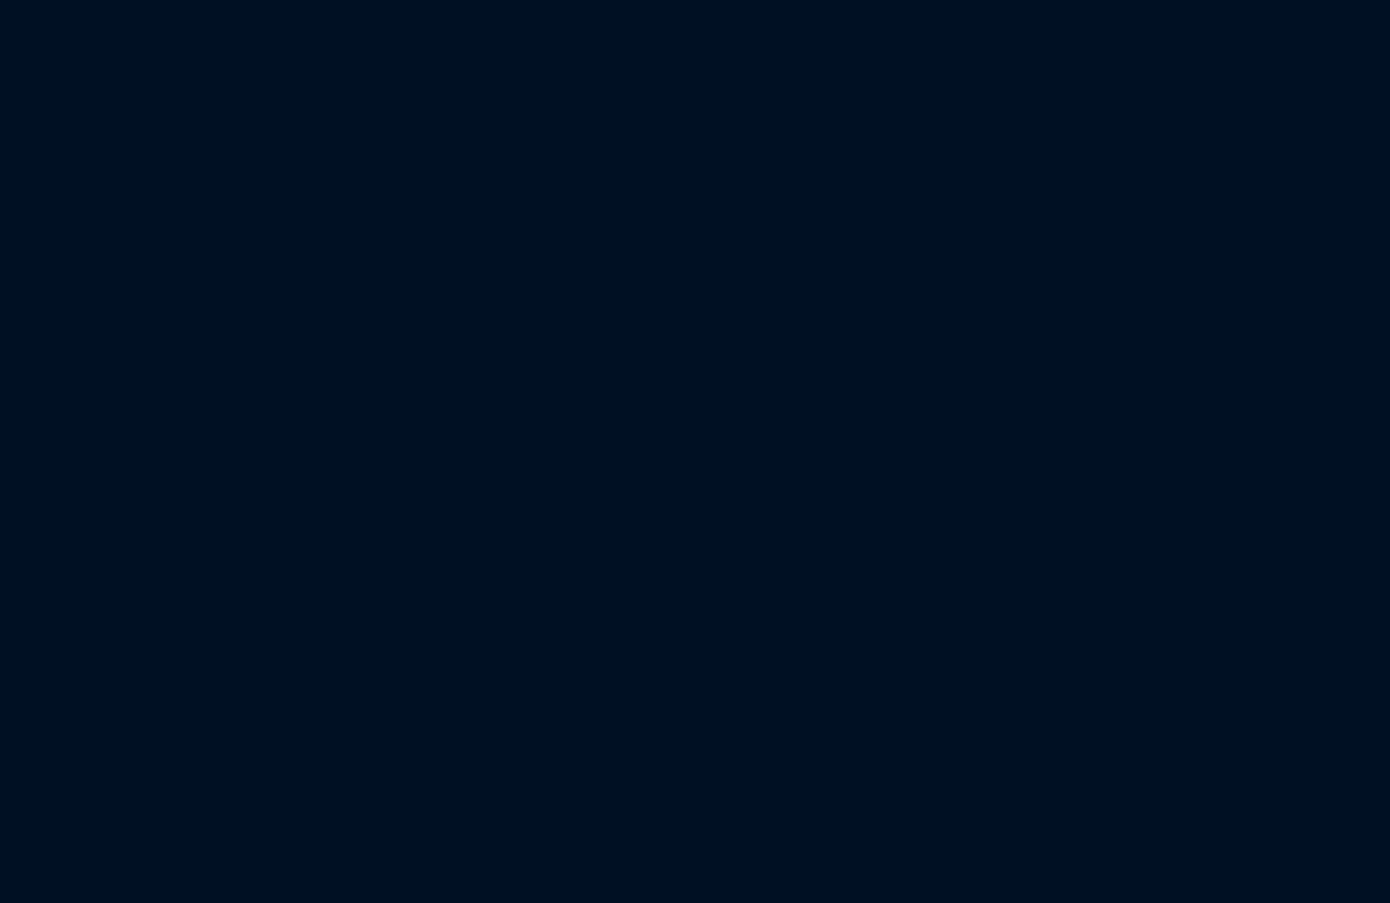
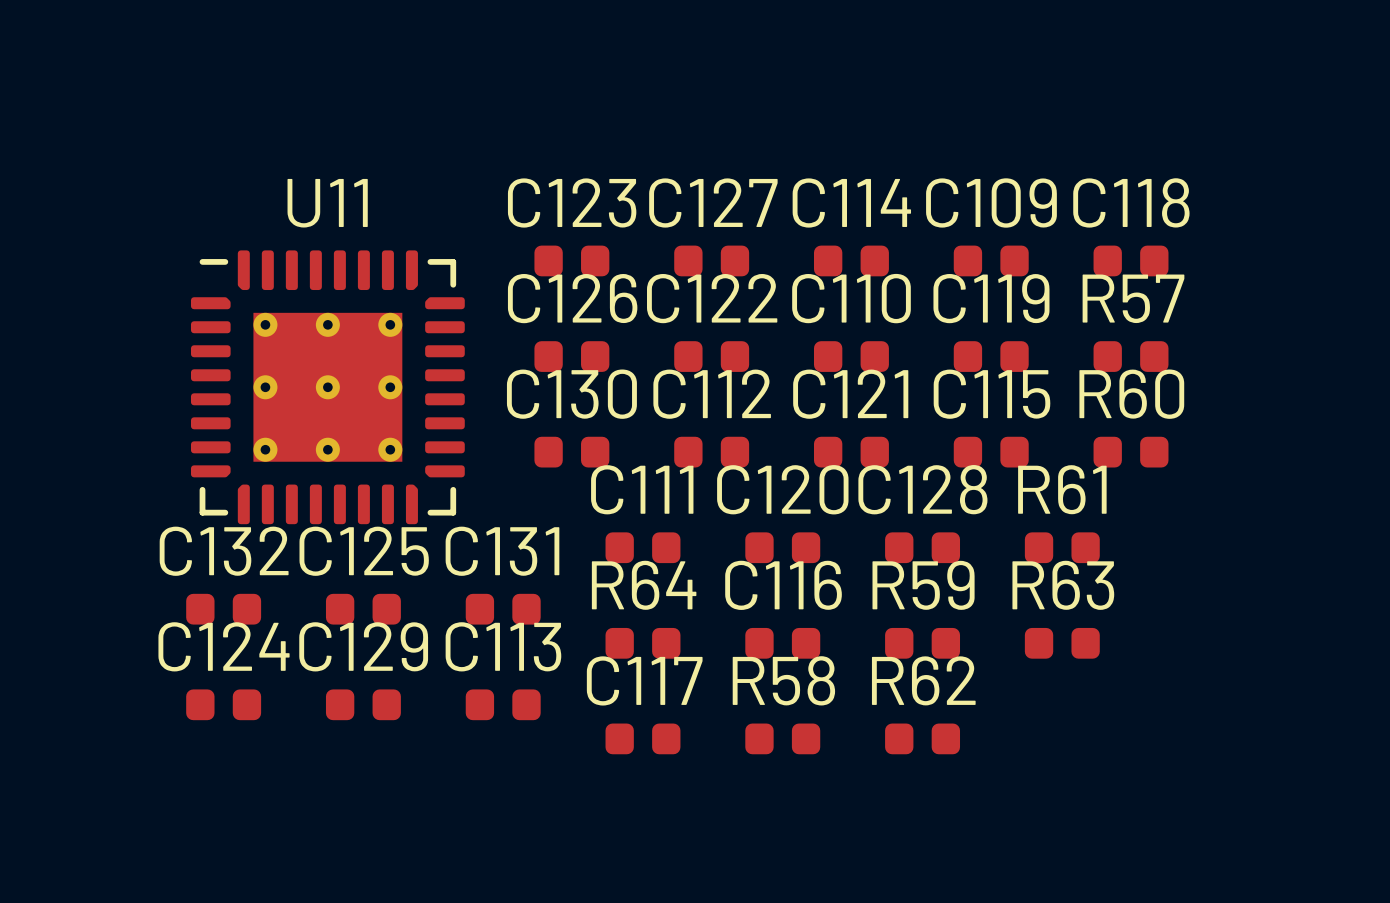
C123: none -> (571, 260)
C127: none -> (711, 260)
C114: none -> (851, 260)
C109: none -> (991, 260)
C118: none -> (1131, 260)
C126: none -> (571, 356)
C122: none -> (711, 356)
C110: none -> (851, 356)
C119: none -> (991, 356)
R57: none -> (1131, 356)
U11: none -> (327, 387)
C130: none -> (571, 452)
C112: none -> (711, 452)
C121: none -> (851, 452)
C115: none -> (991, 452)
R60: none -> (1131, 452)
C111: none -> (642, 547)
C120: none -> (782, 547)
C128: none -> (922, 547)
R61: none -> (1062, 547)
C132: none -> (223, 609)
C125: none -> (363, 609)
C131: none -> (503, 609)
R64: none -> (642, 643)
C116: none -> (782, 643)
R59: none -> (922, 643)
R63: none -> (1062, 643)
C124: none -> (223, 704)
C129: none -> (363, 704)
C113: none -> (503, 704)
C117: none -> (642, 738)
R58: none -> (782, 738)
R62: none -> (922, 738)

